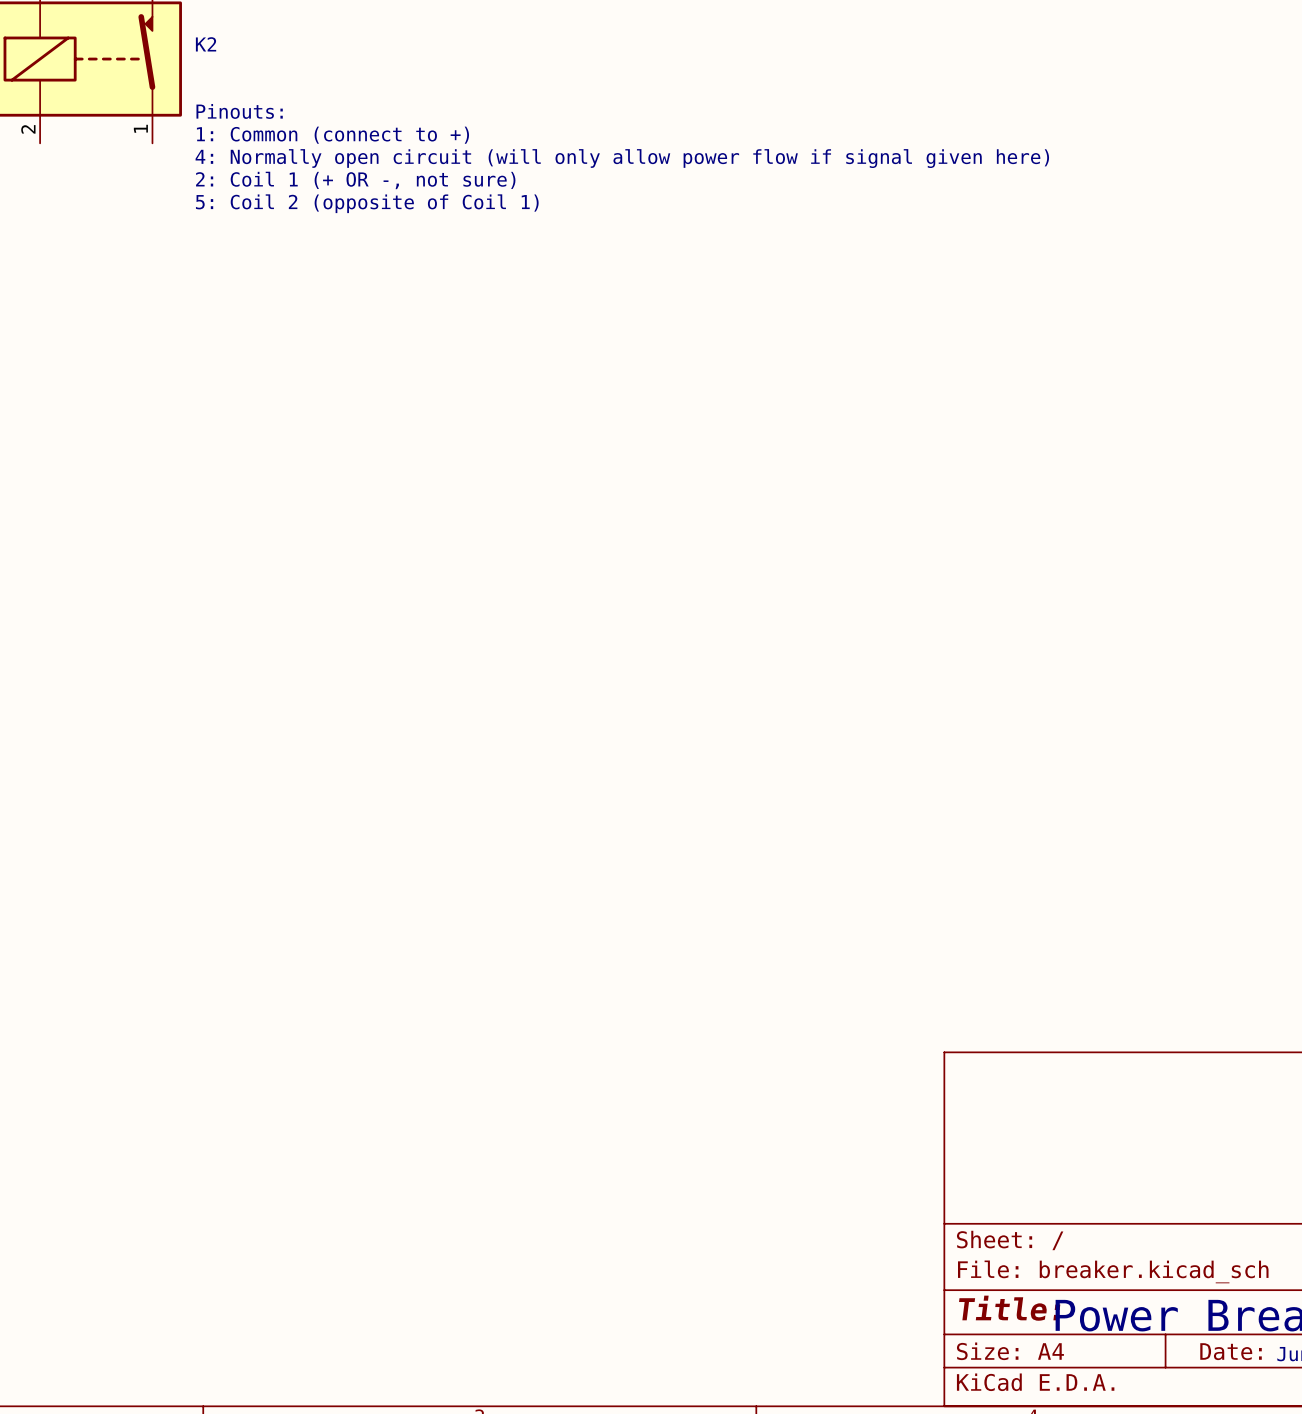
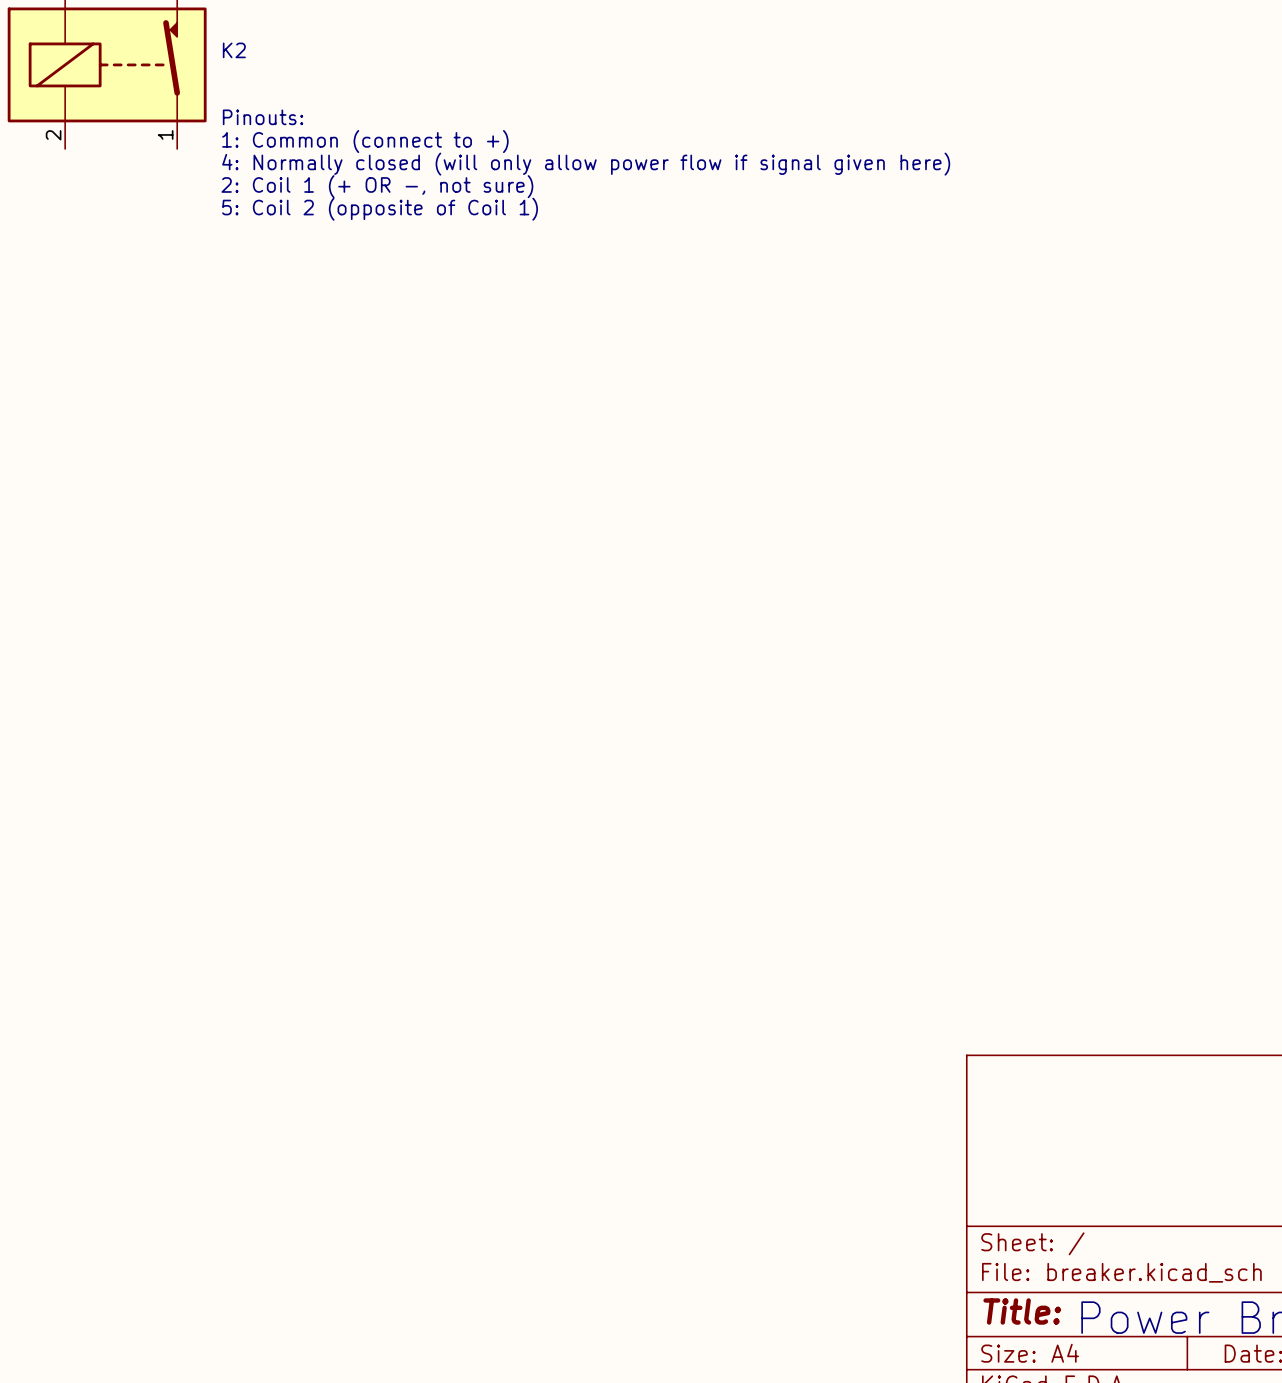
text: 4: Normally open circuit (will only allow power flow if signal given here) (622, 158) -> 4: Normally closed (will only allow power flow if signal given here) (586, 164)

